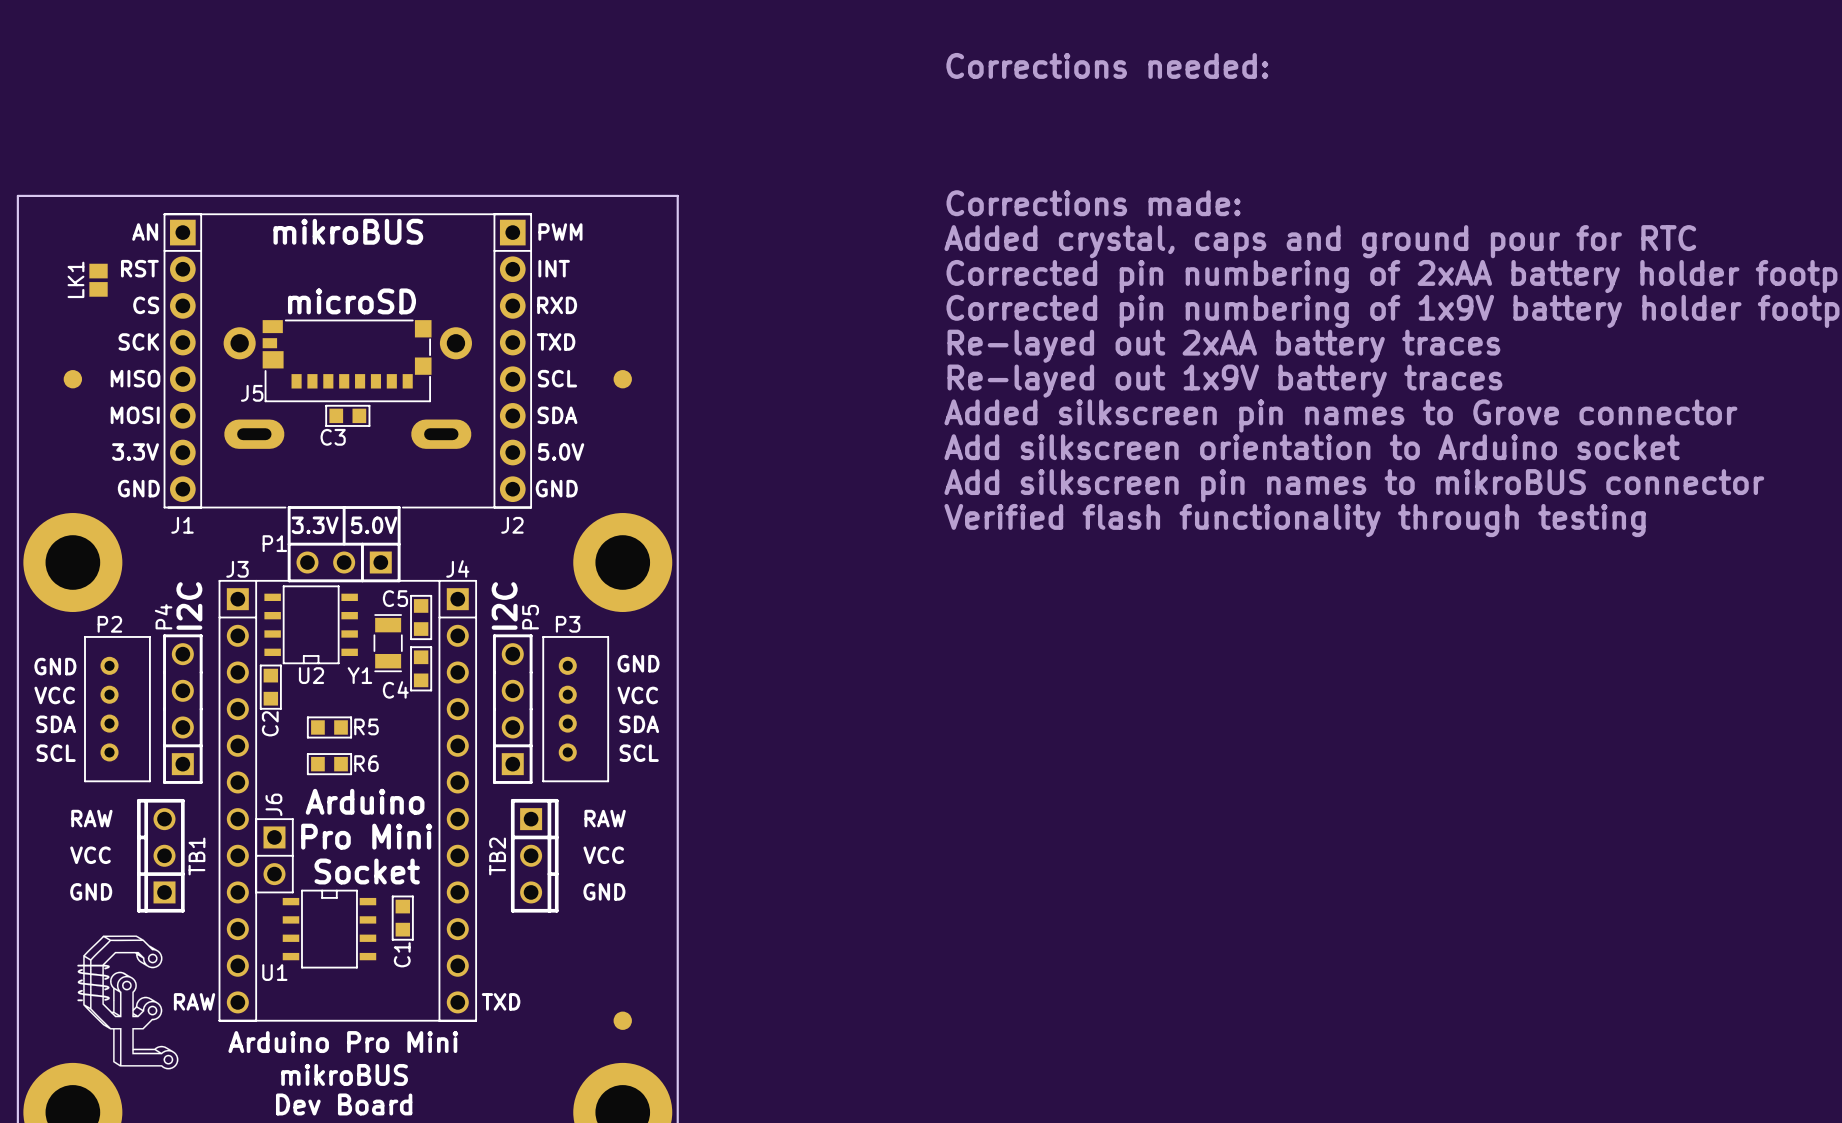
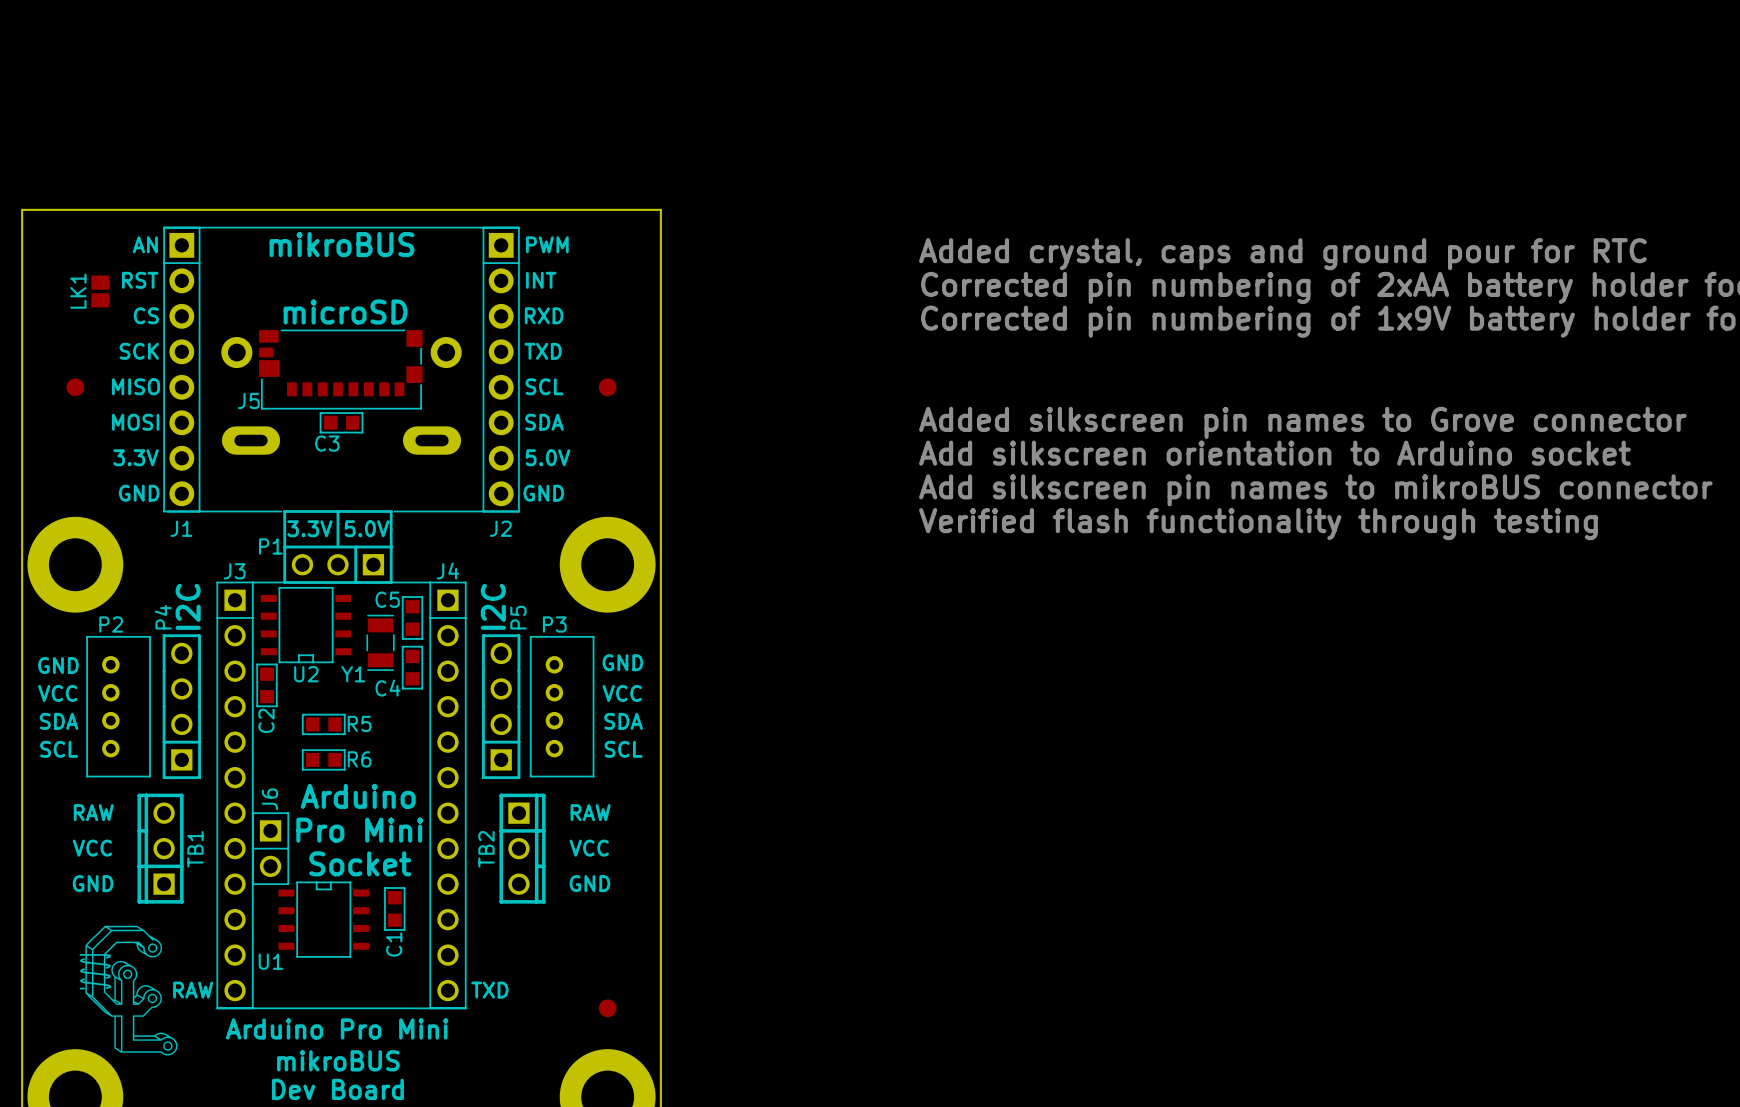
text: Corrections needed: (1107, 65) -> none
text: Corrections made: (1093, 203) -> none
text: Re-layed out 2xAA battery traces (1223, 346) -> none
text: Re-layed out 1x9V battery traces (1224, 381) -> none

